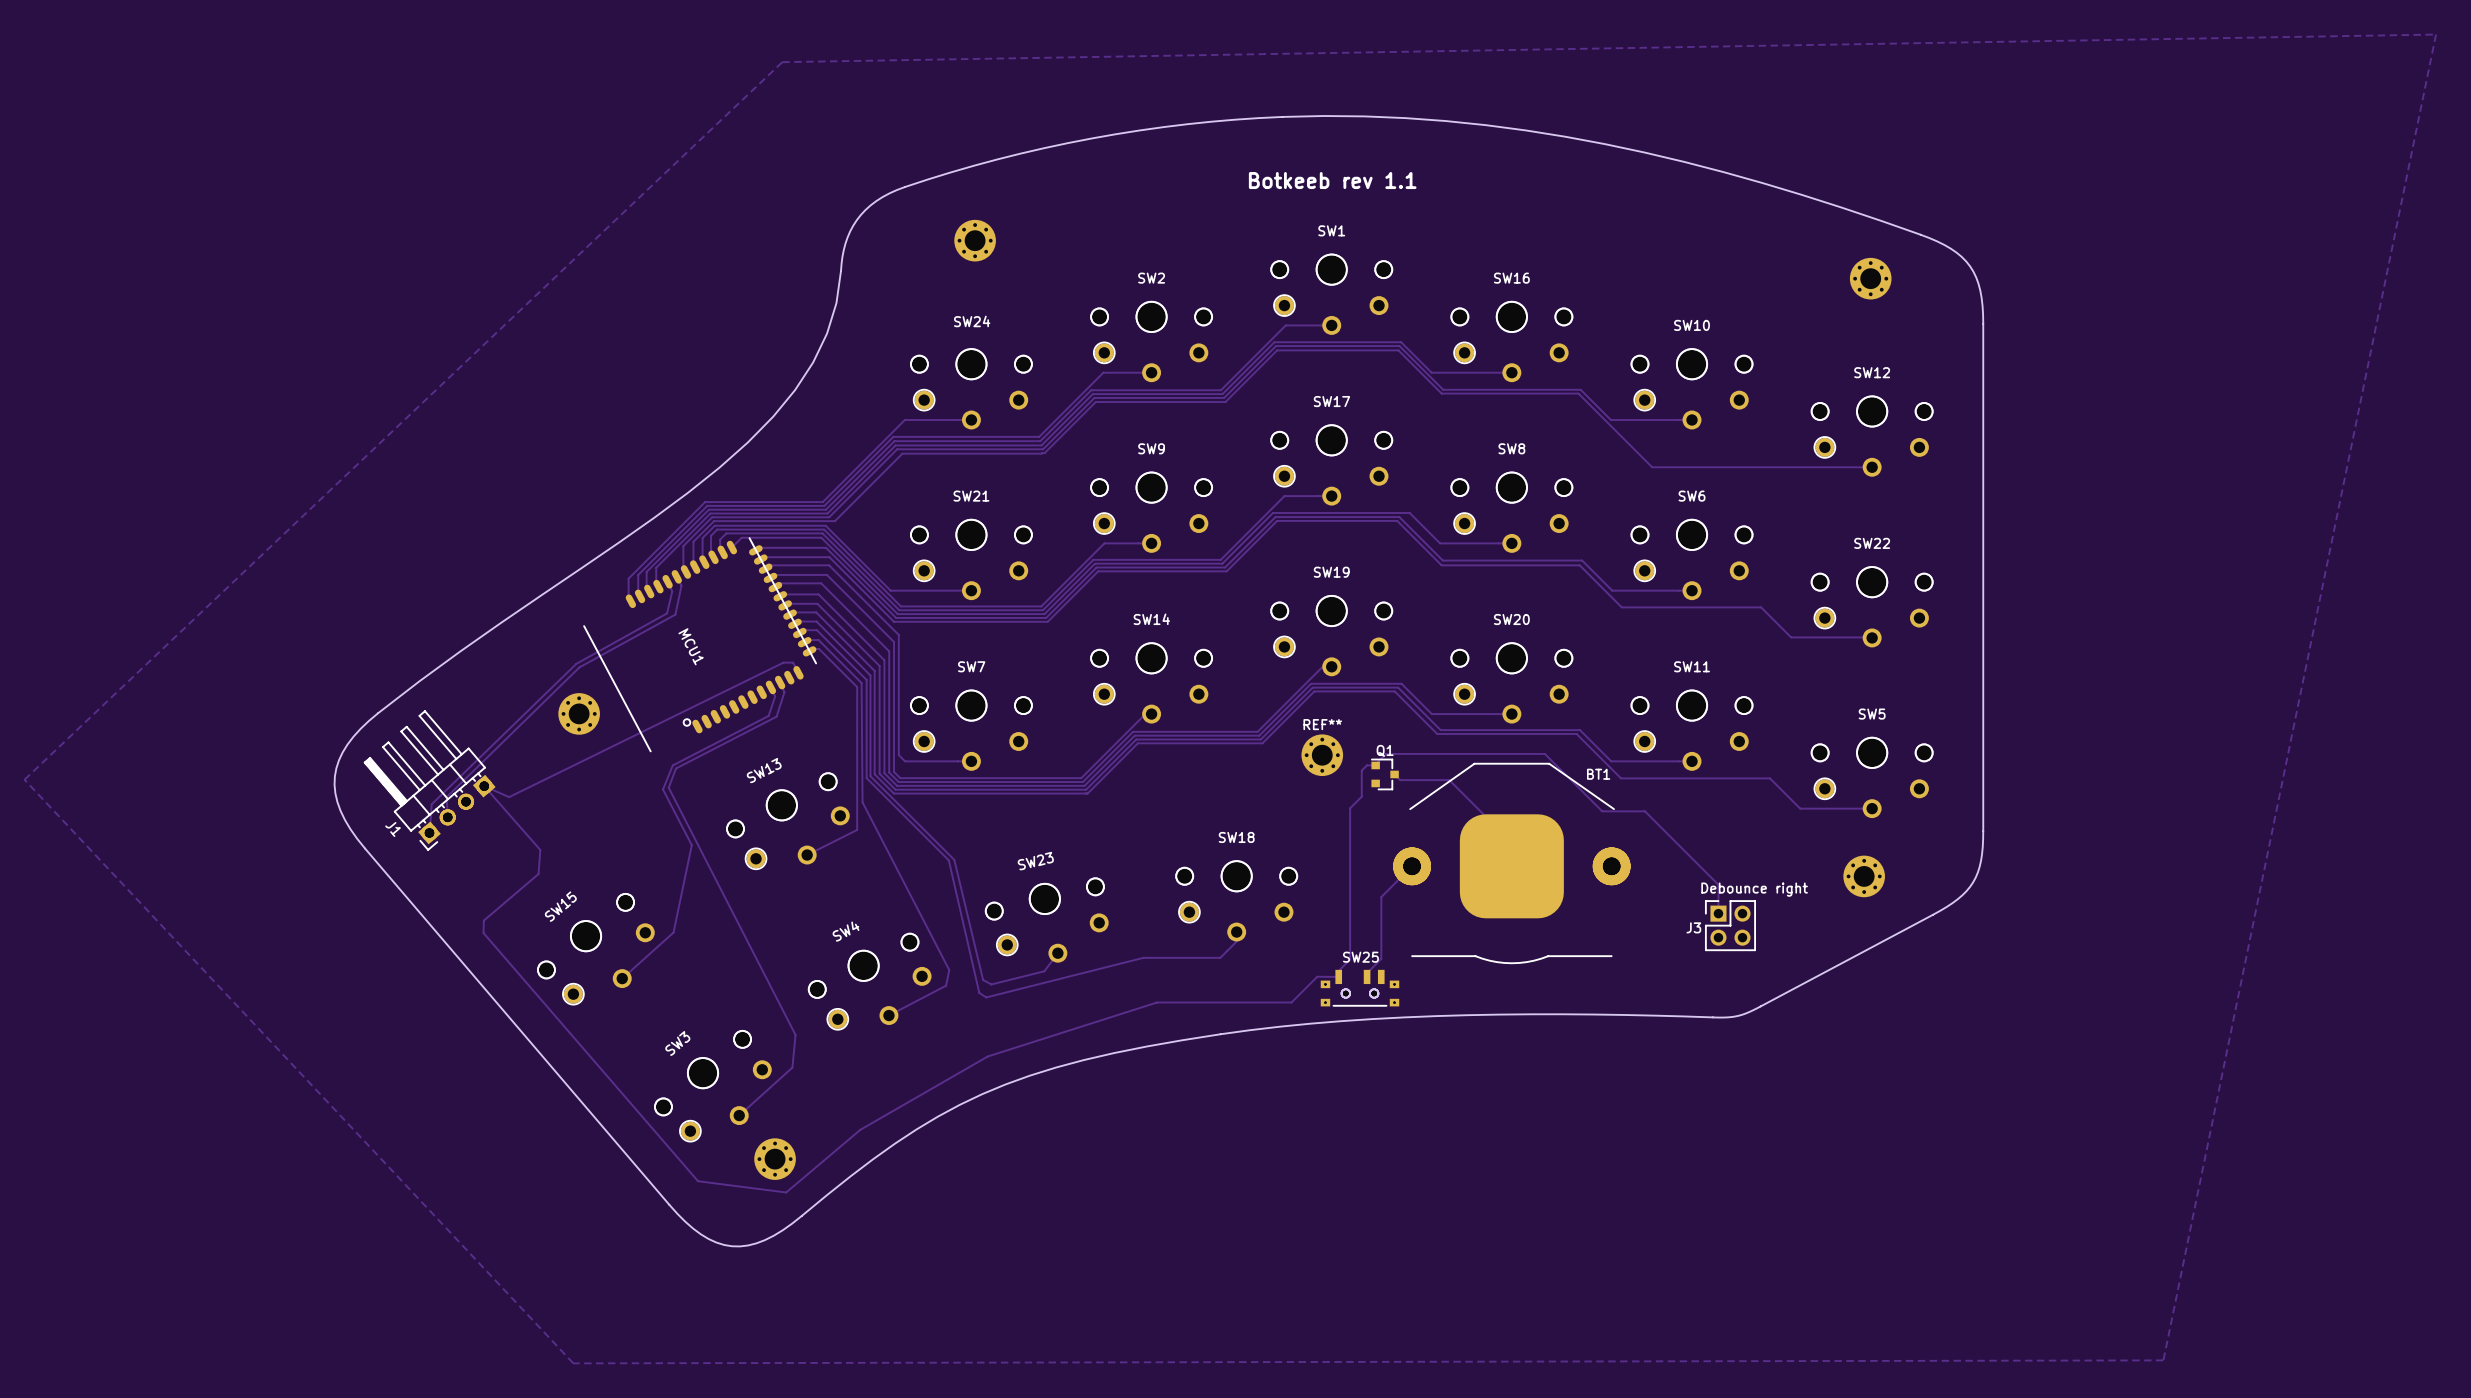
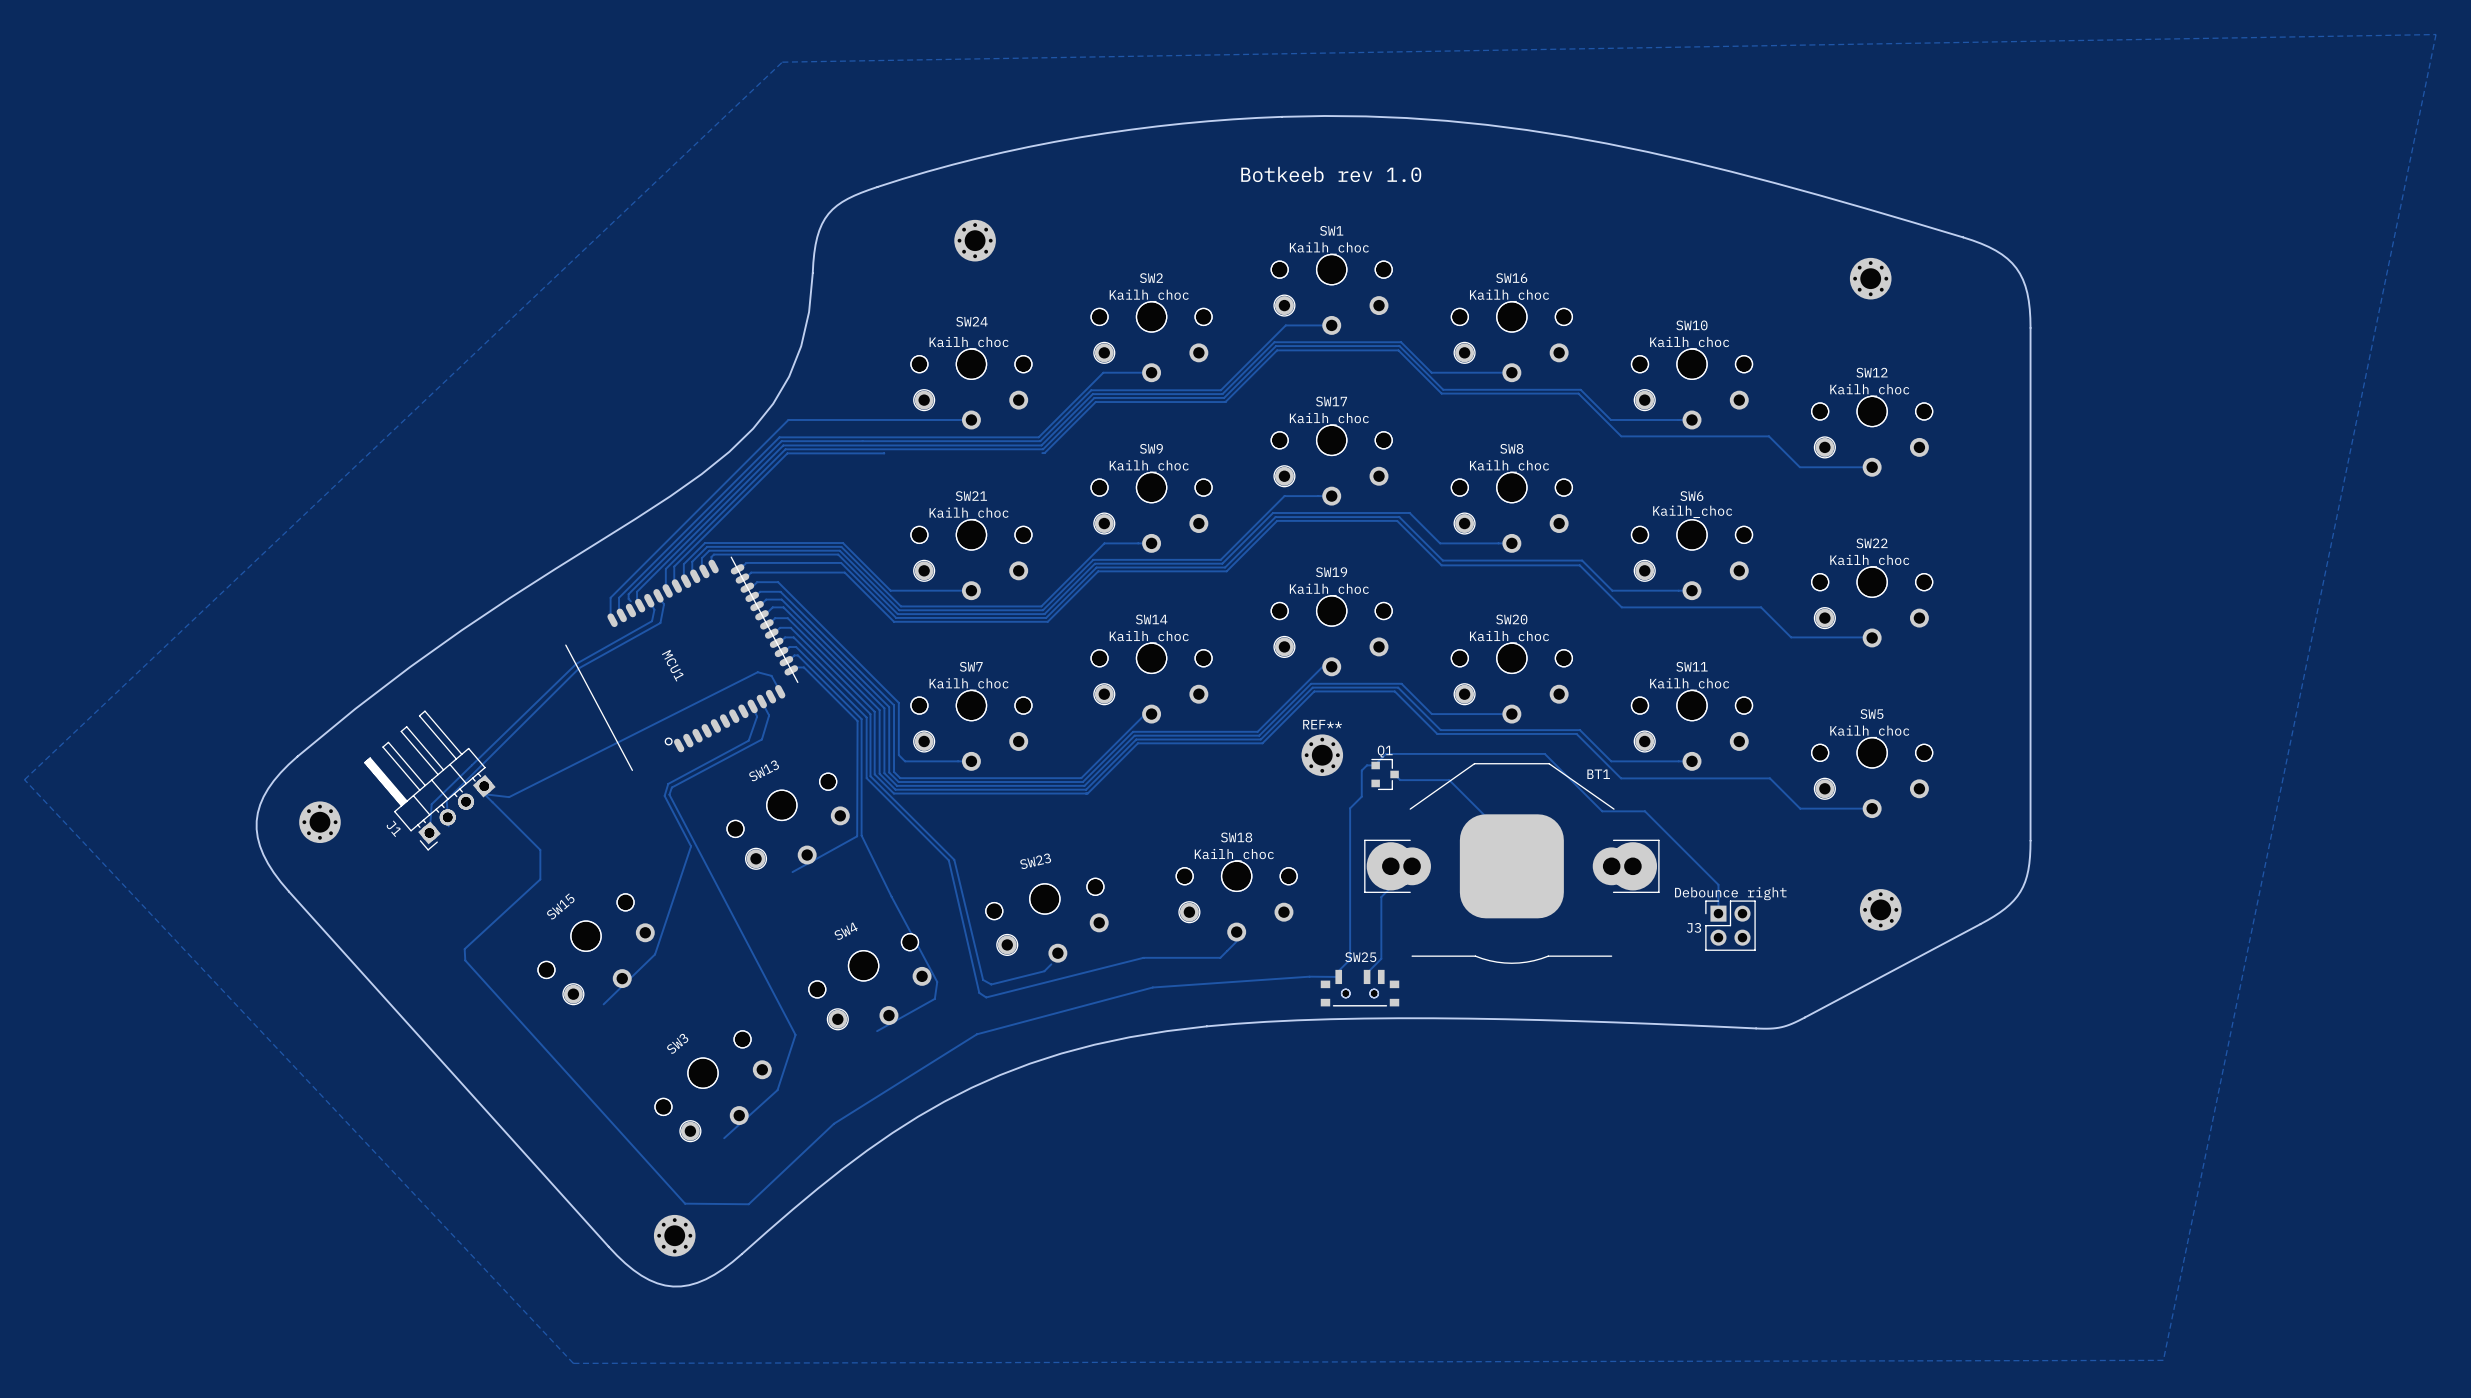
board edge: (1282, 116) (1187, 124) (1068, 143) (950, 172) (896, 190) (876, 201) (860, 214) (847, 237) (842, 256) (836, 303) (827, 333) (813, 362) (795, 390) (773, 416) (747, 442) (688, 492) (460, 651) (378, 713) (353, 736) (342, 752) (334, 776) (335, 793) (340, 810) (357, 838) (669, 1204) (693, 1228) (708, 1239) (724, 1245) (740, 1246) (764, 1240) (792, 1223) (872, 1159) (937, 1116) (1005, 1084) (1056, 1067) (1114, 1053) (1182, 1040) (1249, 1030) (1341, 1021) (1499, 1014) (1720, 1017) (1737, 1015) (1757, 1008) (1940, 910) (1962, 895) (1975, 877) (1981, 860) (1983, 831) (1983, 323) (1978, 283) (1966, 261) (1956, 252) (1937, 241) (1841, 207) (1723, 172) (1605, 144) (1525, 130) (1445, 121) (1364, 116) (1282, 116) -> (1282, 116) (1157, 126) (1054, 141) (927, 171) (869, 189) (842, 201) (825, 218) (817, 237) (809, 312) (801, 346) (789, 376) (773, 403) (753, 428) (729, 451) (670, 496) (510, 597) (410, 667) (297, 756) (273, 780) (263, 796) (256, 821) (257, 837) (263, 854) (280, 881) (608, 1246) (633, 1270) (649, 1280) (665, 1285) (681, 1286) (697, 1282) (714, 1274) (732, 1262) (817, 1188) (892, 1132) (971, 1087) (1029, 1063) (1061, 1053) (1129, 1037) (1167, 1031) (1235, 1023) (1297, 1020) (1469, 1018) (1778, 1027) (1801, 1019) (1987, 920) (2009, 904) (2020, 891) (2026, 876) (2030, 848) (2030, 327) (2028, 300) (2025, 286) (2012, 263) (2001, 254) (1981, 243) (1913, 222) (1731, 171) (1606, 143) (1526, 130) (1446, 120) (1365, 116) (1282, 116)
text: Botkeeb rev 1.1 (1332, 180) -> Botkeeb rev 1.0 (1331, 174)
SW1 value: none -> Kailh_choc (1329, 248)
SW2 value: none -> Kailh_choc (1149, 295)
SW16 value: none -> Kailh_choc (1509, 295)
SW24 value: none -> Kailh_choc (969, 343)
SW10 value: none -> Kailh_choc (1689, 343)
SW12 value: none -> Kailh_choc (1869, 390)
SW17 value: none -> Kailh_choc (1329, 419)
track: (904, 419) (822, 502) (705, 502) (628, 578) (628, 594) -> (904, 419) (788, 419) (610, 597) (610, 618) (612, 620)
track: (1039, 436) (893, 436) (824, 505) (707, 505) (638, 574) (640, 596) -> (1039, 436) (779, 437) (619, 597) (619, 612) (621, 615)
track: (1621, 436) (1652, 467) (1799, 467) -> (1621, 436) (1769, 436) (1799, 467)
track: (894, 441) (825, 509) (708, 509) (646, 571) (646, 588) (649, 591) -> (894, 441) (781, 441) (628, 594)
track: (895, 445) (827, 513) (710, 513) (656, 567) (656, 584) (658, 586) -> (895, 445) (783, 445) (637, 591) (637, 602) (640, 605)
track: (897, 449) (829, 517) (712, 517) (683, 546) (683, 569) (685, 571) -> (897, 449) (785, 449) (665, 568) (665, 589) (667, 590)
track: none -> (884, 453) (787, 453) (674, 566) (674, 583) (676, 586)
track: (1042, 453) (902, 453) (834, 521) (714, 521) (693, 541) (693, 565) (695, 567) -> none
SW9 value: none -> Kailh_choc (1149, 466)
SW8 value: none -> Kailh_choc (1509, 466)
SW6 value: none -> Kailh_choc (1692, 511)
SW21 value: none -> Kailh_choc (969, 513)
track: (842, 543) (825, 525) (714, 525) (702, 537) (704, 562) -> (842, 543) (705, 543) (683, 564) (683, 579) (686, 581)
track: (841, 546) (824, 529) (717, 529) (711, 535) (711, 554) (713, 557) -> (841, 546) (707, 546) (692, 561) (692, 573) (695, 576)
track: (731, 547) (741, 537) (821, 537) (838, 554) -> (713, 566) (711, 564) (711, 556) (713, 554) (838, 554)
track: (755, 550) (758, 547) (826, 547) (841, 562) -> (737, 569) (746, 562) (841, 562)
track: (839, 550) (822, 533) (726, 533) (720, 539) (720, 549) (722, 552) -> (839, 550) (709, 550) (701, 558) (701, 568) (704, 571)
track: (760, 559) (763, 557) (829, 557) (844, 572) -> (742, 578) (751, 572) (844, 572)
SW22 value: none -> Kailh_choc (1869, 561)
track: (765, 568) (768, 565) (829, 565) (898, 635) (898, 702) -> (747, 587) (751, 587) (757, 582) (778, 582) (898, 702)
track: (676, 576) (681, 585) (675, 614) (579, 667) (446, 797) (447, 817) -> none
track: (770, 577) (774, 574) (827, 574) (894, 641) (894, 705) -> (752, 596) (755, 596) (760, 591) (780, 591) (894, 705)
track: (667, 581) (672, 591) (667, 613) (576, 663) -> (649, 600) (654, 609) (652, 621) (576, 663)
track: (775, 587) (779, 583) (821, 583) (889, 651) (889, 707) -> (757, 606) (766, 599) (781, 599) (889, 707)
SW19 value: none -> Kailh_choc (1329, 589)
track: none -> (658, 595) (664, 604) (660, 623) (579, 668) (446, 800) (448, 826)
track: (780, 596) (782, 594) (818, 594) (884, 660) (884, 708) -> (761, 615) (764, 615) (772, 607) (783, 607) (884, 708)
track: (785, 605) (786, 603) (817, 603) (879, 666) (879, 710) -> (766, 624) (775, 618) (787, 618) (879, 710)
track: (790, 614) (792, 612) (816, 612) (874, 670) (874, 711) -> (771, 633) (779, 627) (790, 627) (874, 711)
track: (794, 623) (799, 621) (816, 621) (870, 675) (870, 714) -> (776, 642) (779, 642) (785, 637) (793, 637) (870, 714)
track: (799, 633) (802, 630) (816, 630) (866, 679) (866, 717) -> (781, 651) (784, 651) (789, 647) (796, 647) (866, 717)
SW14 value: none -> Kailh_choc (1149, 637)
SW20 value: none -> Kailh_choc (1509, 637)
track: (804, 642) (806, 640) (818, 640) (861, 683) (862, 802) (949, 970) (946, 985) (888, 1015) -> none
MCU1 position: (700, 644) -> (681, 663)
track: (809, 651) (812, 648) (819, 648) (857, 687) (857, 829) (807, 855) -> none
track: none -> (786, 661) (794, 655) (797, 655) (861, 719) (861, 835) (937, 981) (934, 998) (877, 1031)
track: none -> (791, 670) (794, 667) (803, 667) (857, 721) (857, 836) (792, 872)
track: (798, 672) (793, 662) (783, 662) (509, 797) (484, 786) (540, 849) (538, 874) (483, 920) (483, 933) (698, 1181) (786, 1192) (860, 1129) (987, 1056) (1157, 1002) (1291, 1002) (1317, 976) -> (780, 691) (771, 675) (757, 672) (509, 797) (484, 794) (540, 849) (540, 879) (464, 949) (465, 960) (685, 1203) (748, 1204) (833, 1123) (976, 1034) (1152, 987) (1317, 976)
track: (780, 682) (784, 692) (776, 716) (675, 768) (668, 787) (795, 1034) (792, 1067) (739, 1115) -> none
SW7 value: none -> Kailh_choc (969, 684)
SW11 value: none -> Kailh_choc (1689, 684)
track: (770, 687) (775, 696) (768, 715) (672, 765) (663, 789) (691, 845) (673, 932) (622, 978) -> none
track: none -> (761, 701) (769, 715) (761, 739) (671, 787) (669, 794) (795, 1034) (777, 1090) (724, 1138)
track: none -> (752, 706) (757, 716) (748, 740) (668, 783) (664, 795) (691, 846) (655, 954) (603, 1004)
part: (579, 713) -> none
SW5 value: none -> Kailh_choc (1869, 731)
BT1 footprint: [1393, 763, 1631, 964] -> [1364, 763, 1660, 964]
part: none -> (319, 822)
SW18 value: none -> Kailh_choc (1234, 855)
part position: (1864, 876) -> (1880, 909)
text position: Debounce right (1754, 889) -> Debounce right (1730, 893)
track: (1057, 953) (1044, 971) -> (1051, 964) (1044, 971)
SW25 footprint: [1320, 969, 1400, 1007] -> [1320, 969, 1400, 1007]
part footprint: [1323, 982, 1397, 1005] -> [1341, 989, 1379, 998]
part position: (775, 1159) -> (674, 1235)

